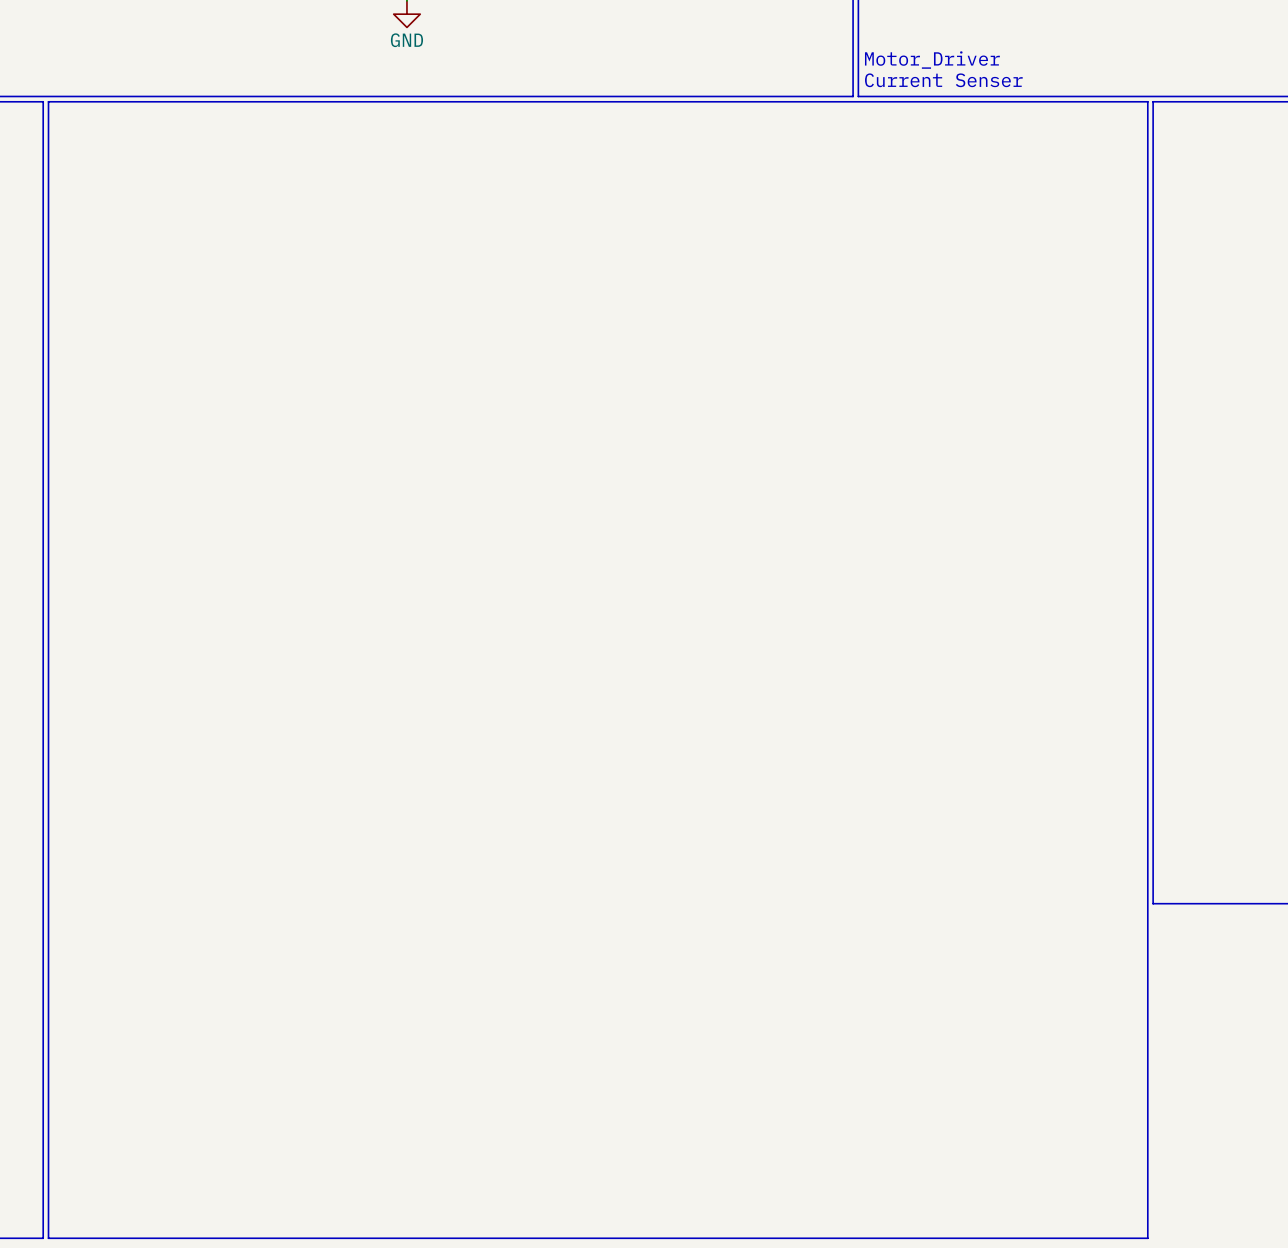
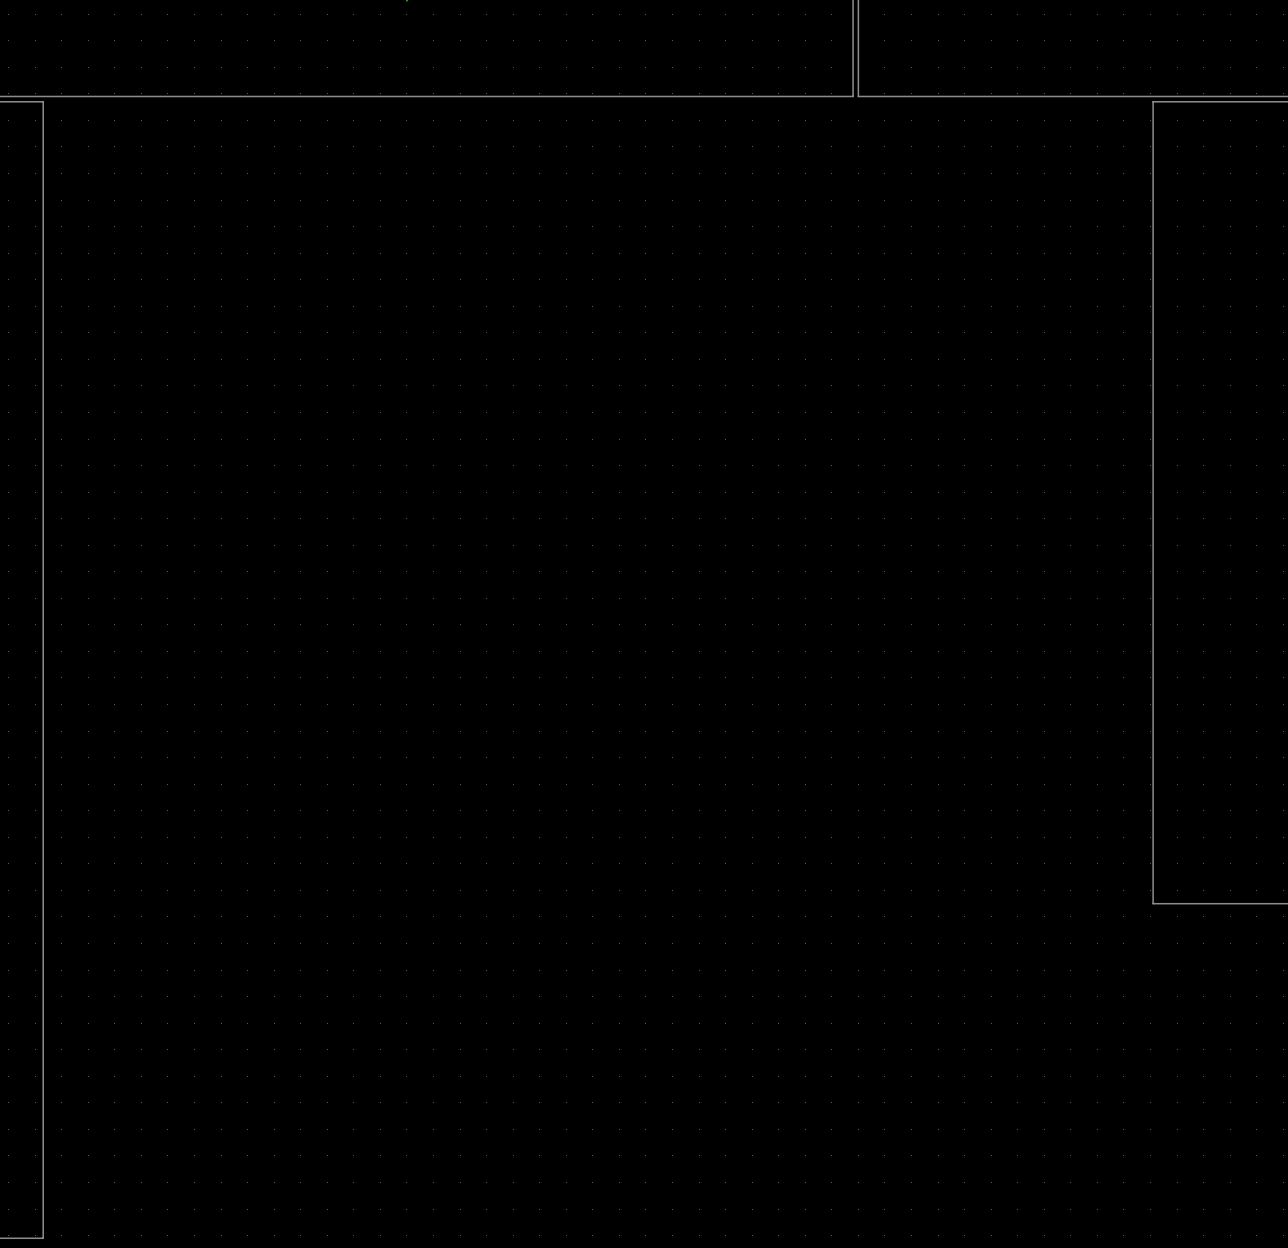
power symbol: GND (406, 14) -> none
text: Motor_Driver (932, 60) -> none
text: Current Senser (943, 80) -> none
line: (48, 101) (1147, 101) (1147, 1238) (48, 1238) (48, 101) -> none

